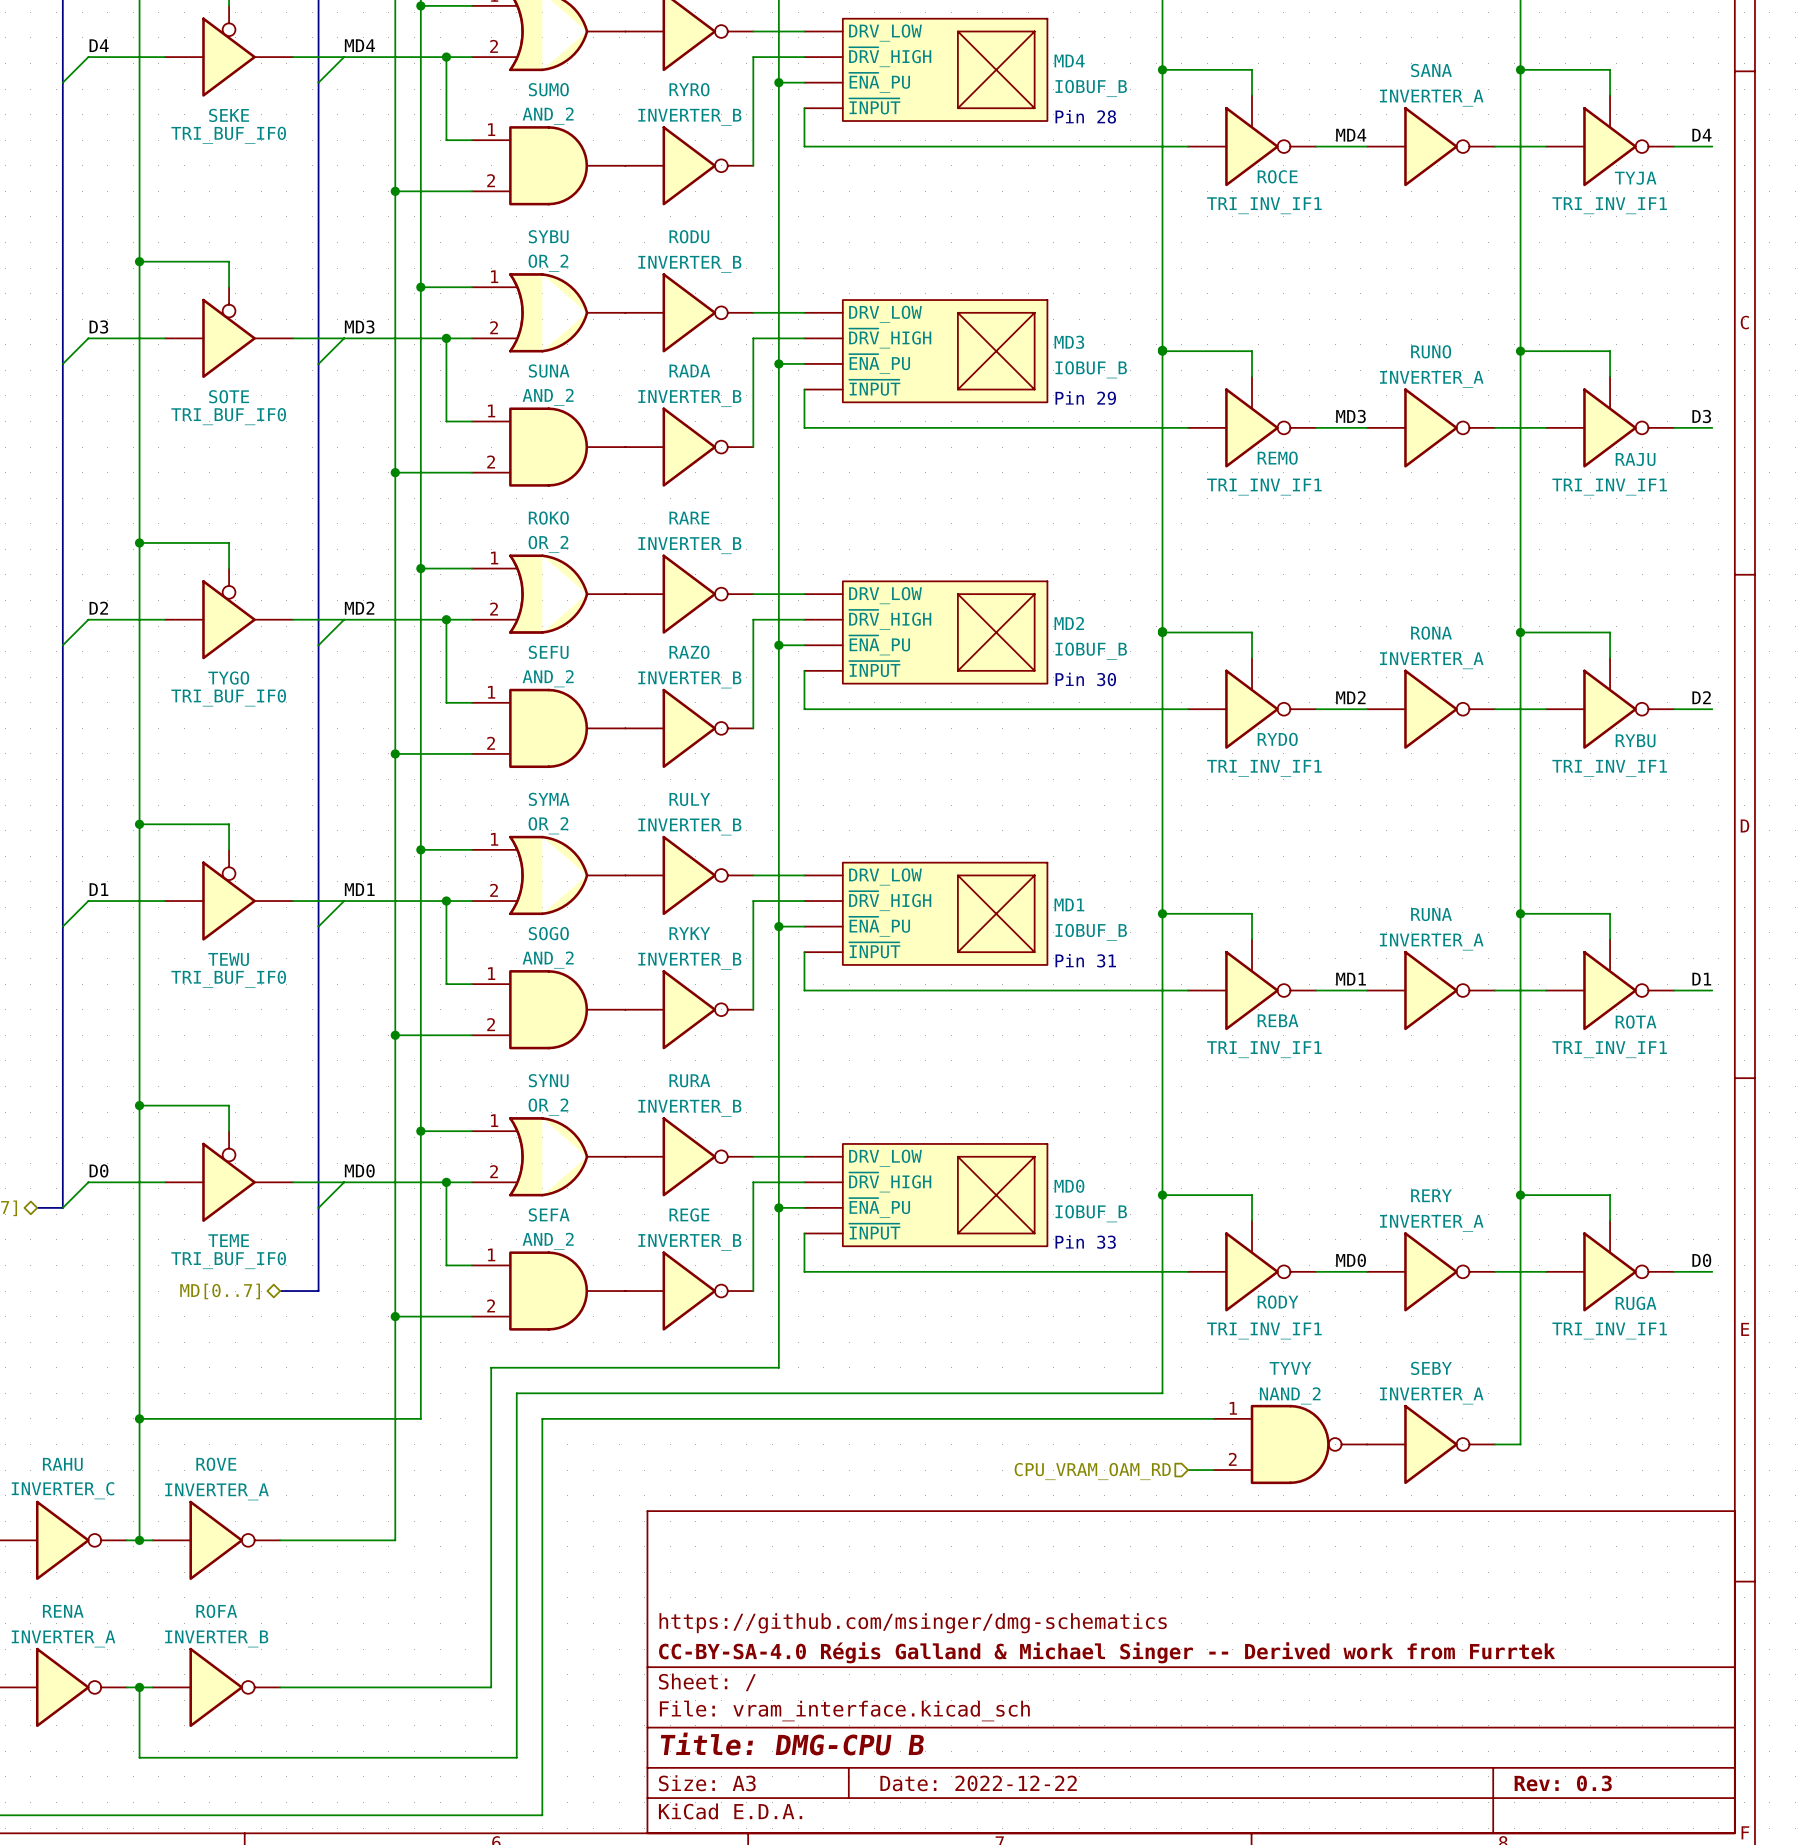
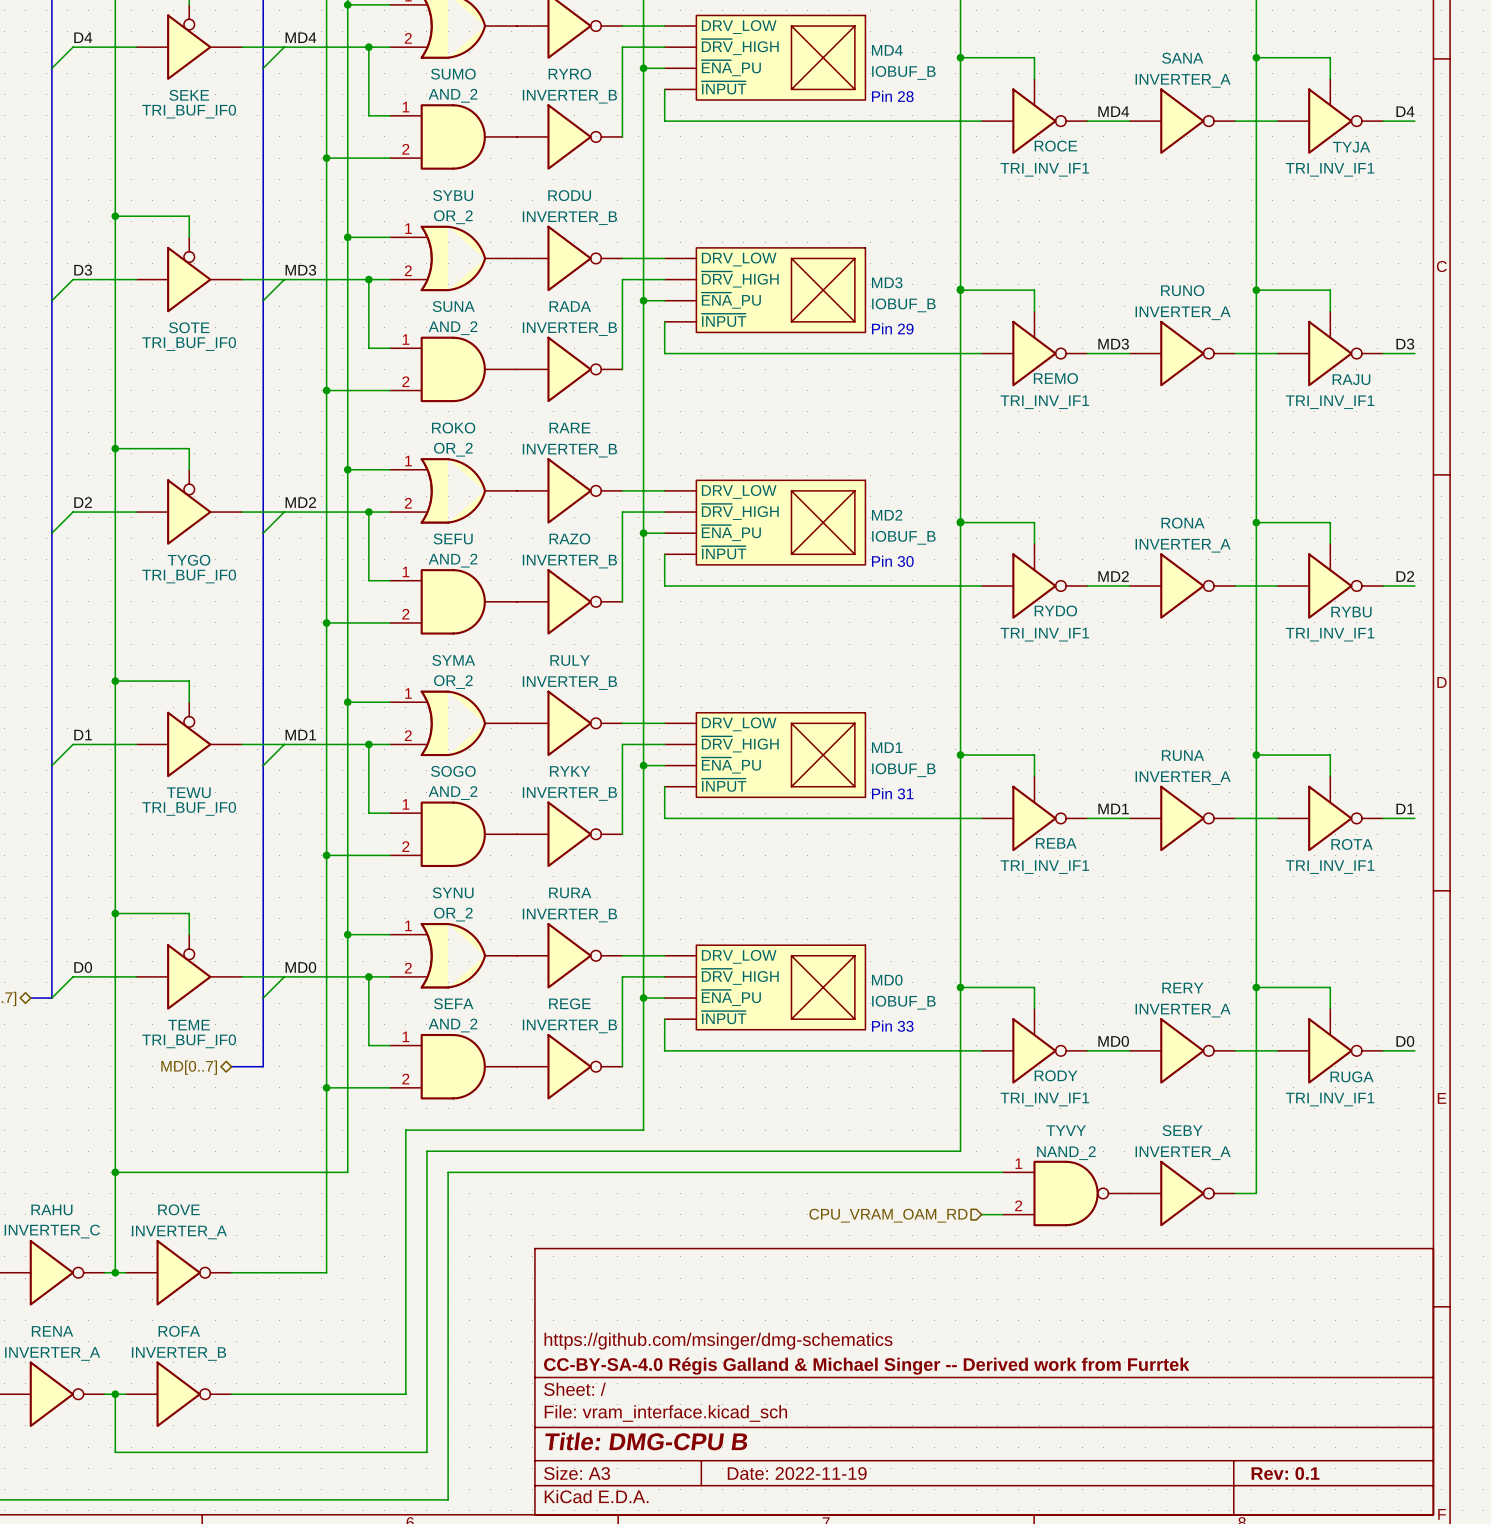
title block: Date: 2022-12-22 (978, 1783) -> Date: 2022-11-19 (797, 1473)
title block: Rev: 0.3 (1563, 1783) -> Rev: 0.1 (1285, 1473)

